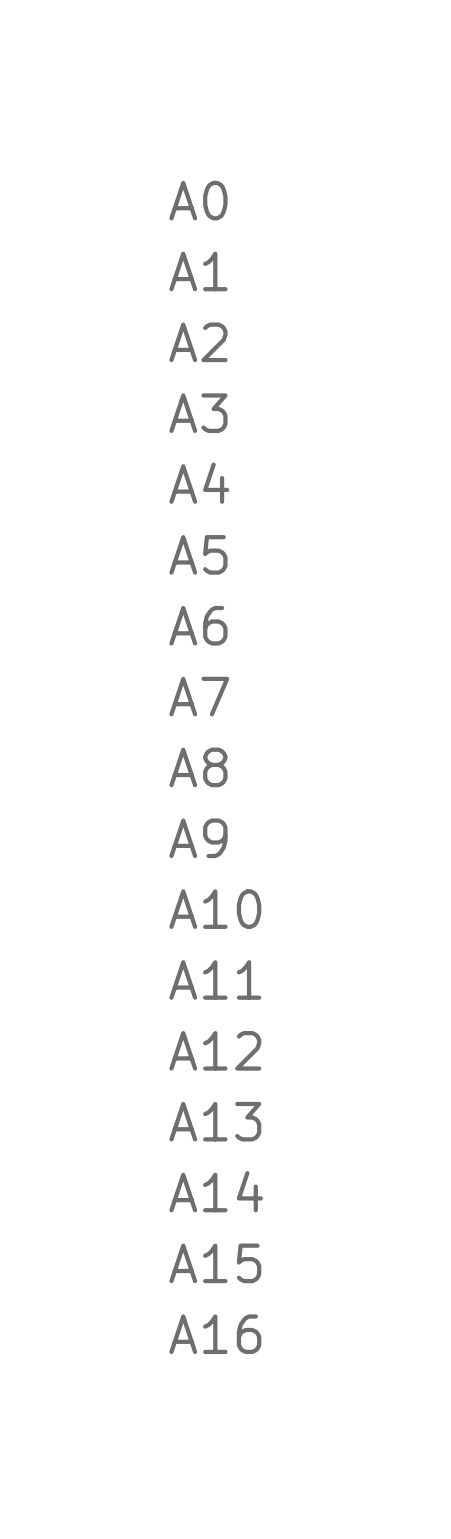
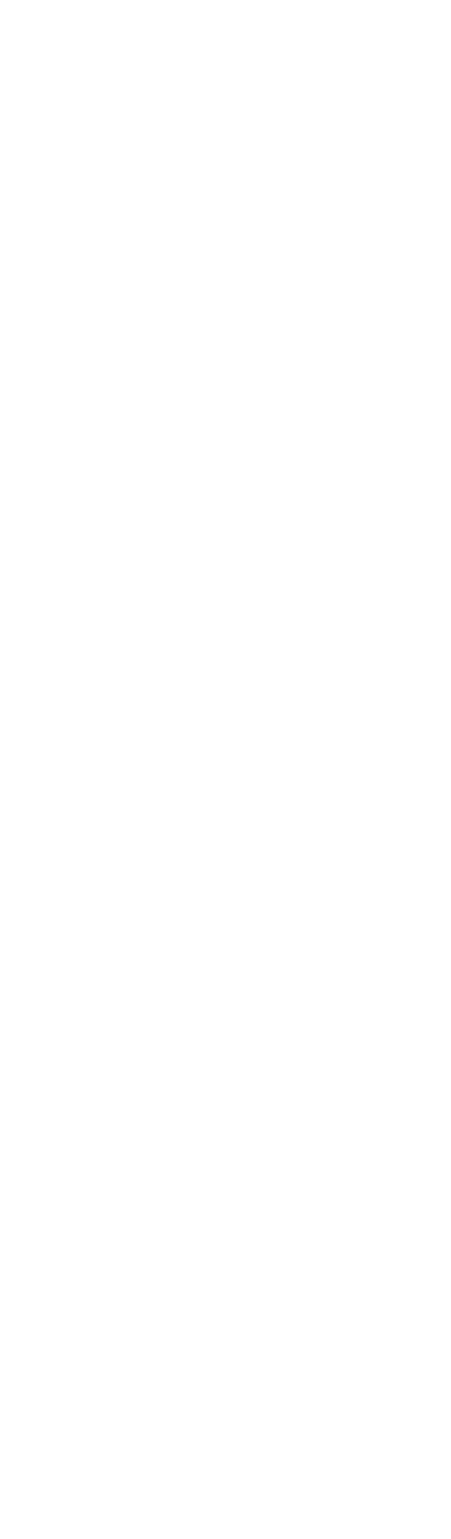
label: A0 (198, 200) -> none
label: A1 (198, 271) -> none
label: A2 (198, 342) -> none
label: A3 (198, 413) -> none
label: A4 (199, 483) -> none
label: A5 (198, 554) -> none
label: A6 (198, 625) -> none
label: A7 (199, 696) -> none
label: A8 (198, 767) -> none
label: A9 (198, 838) -> none
label: A10 (215, 909) -> none
label: A11 (215, 979) -> none
label: A12 (215, 1050) -> none
label: A13 (215, 1121) -> none
label: A14 (216, 1191) -> none
label: A15 (215, 1263) -> none
label: A16 (215, 1334) -> none

